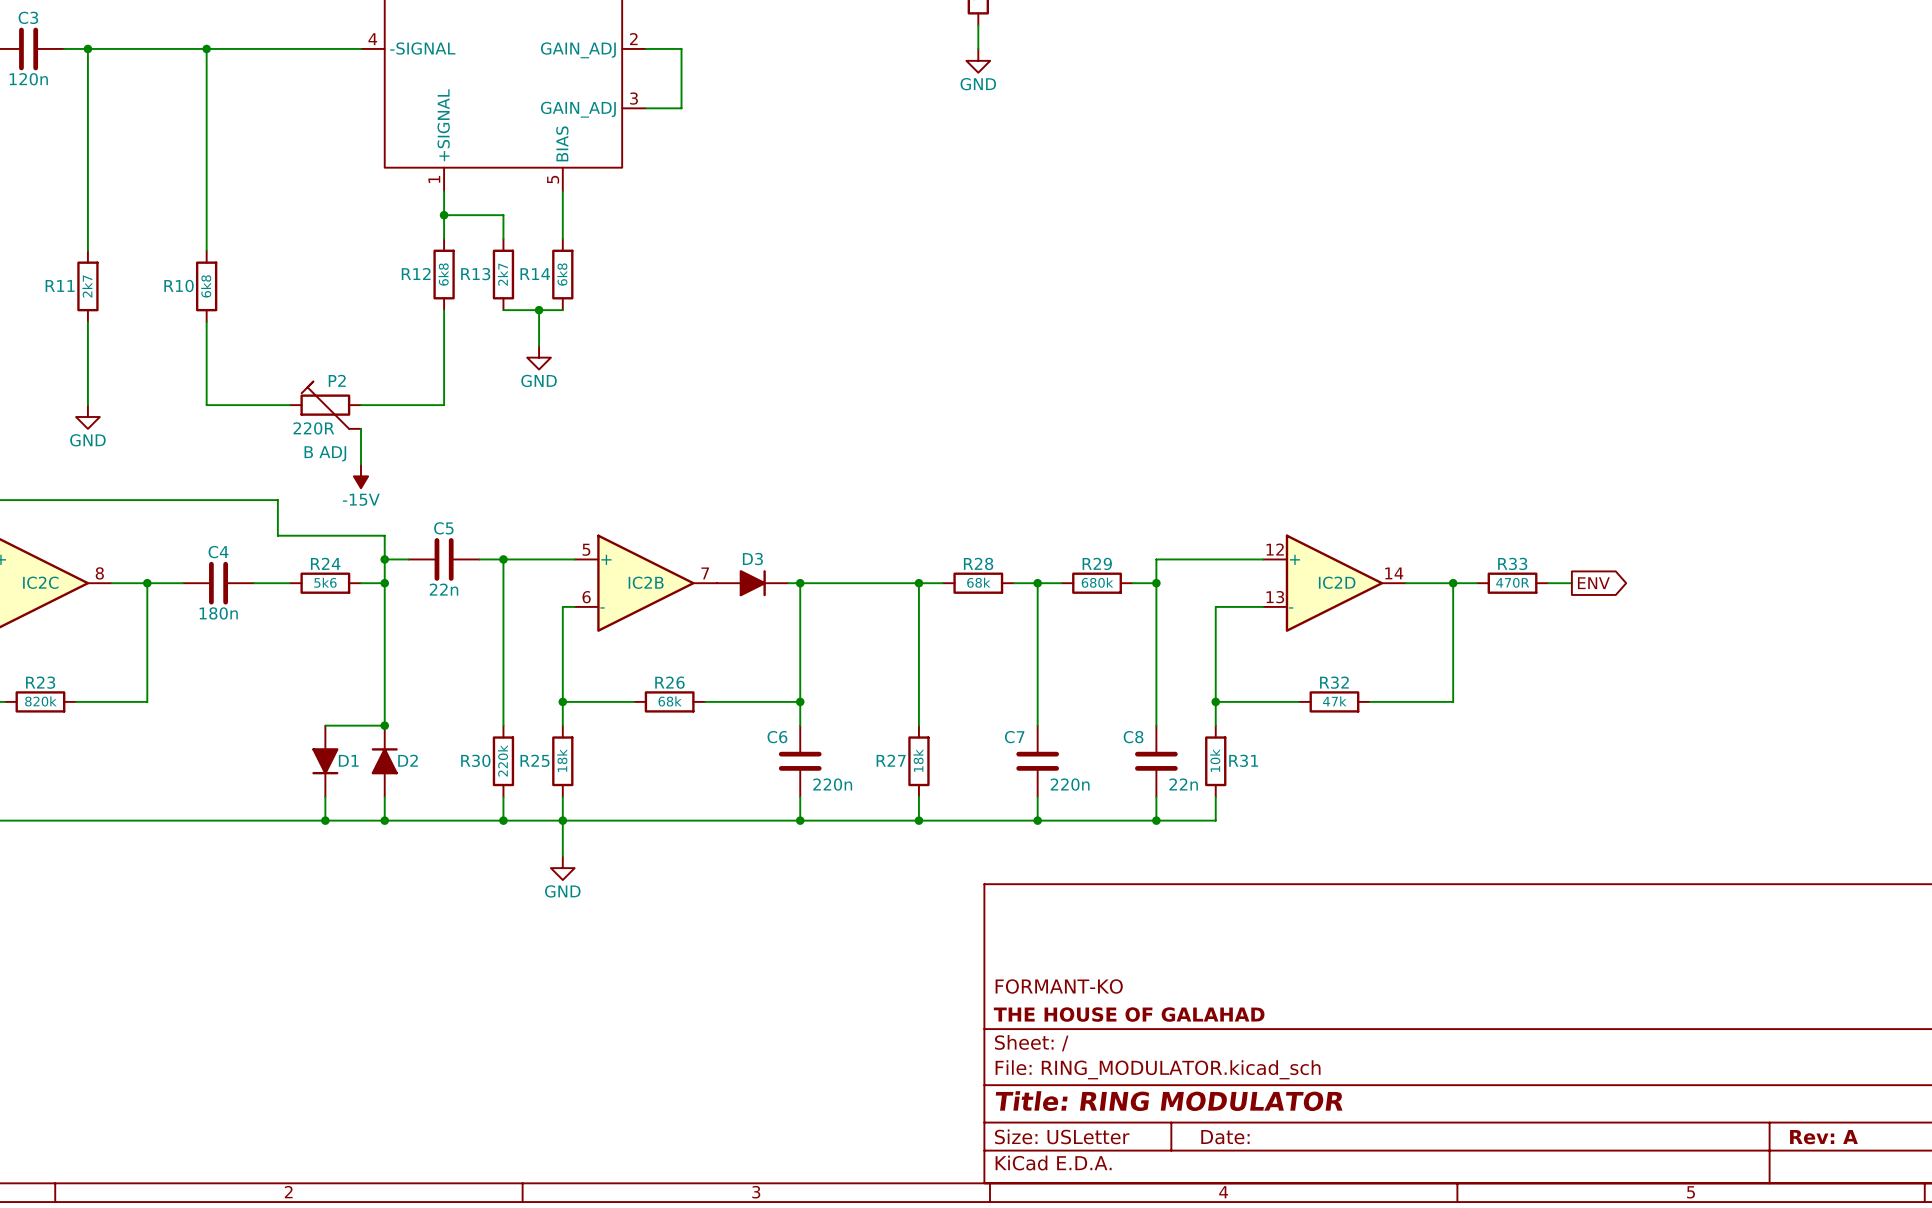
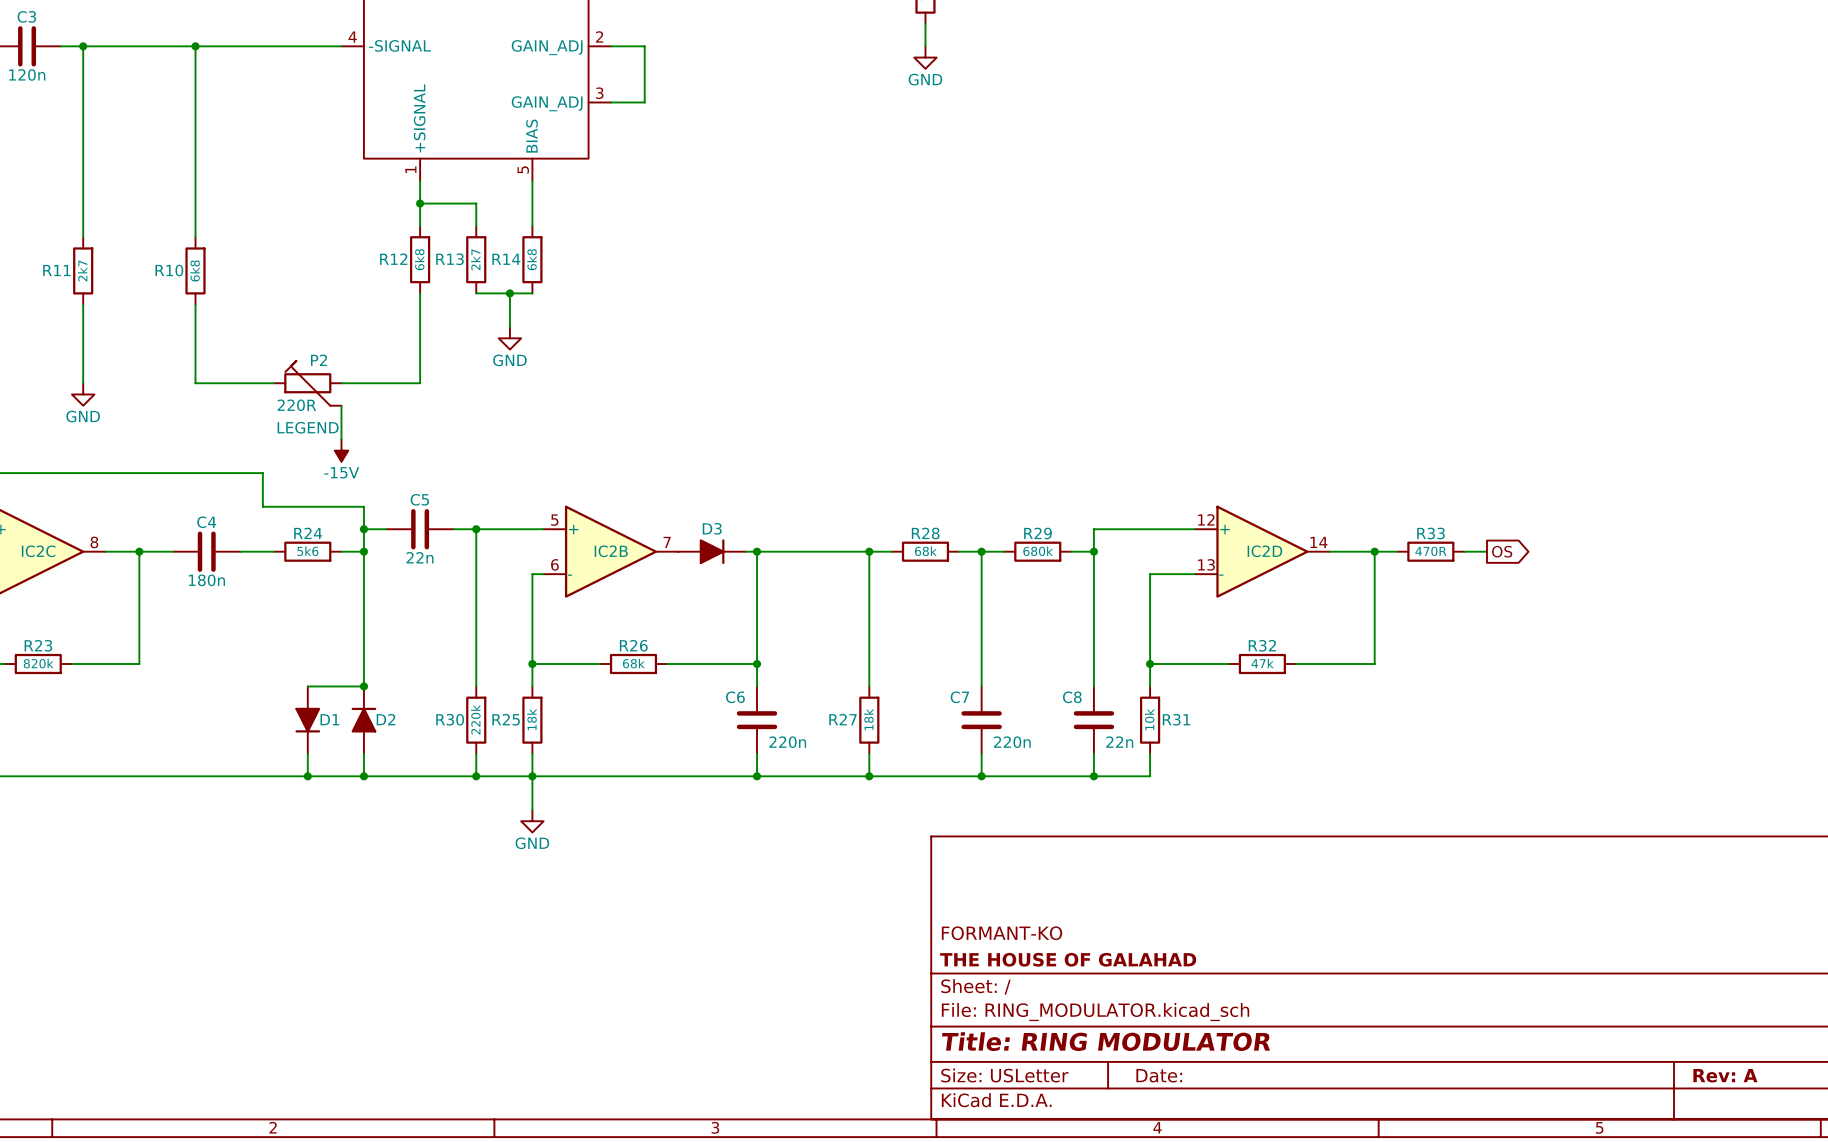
P2 text: B ADJ (325, 453) -> LEGEND (308, 427)
global label: ENV (1593, 583) -> OS (1502, 551)

